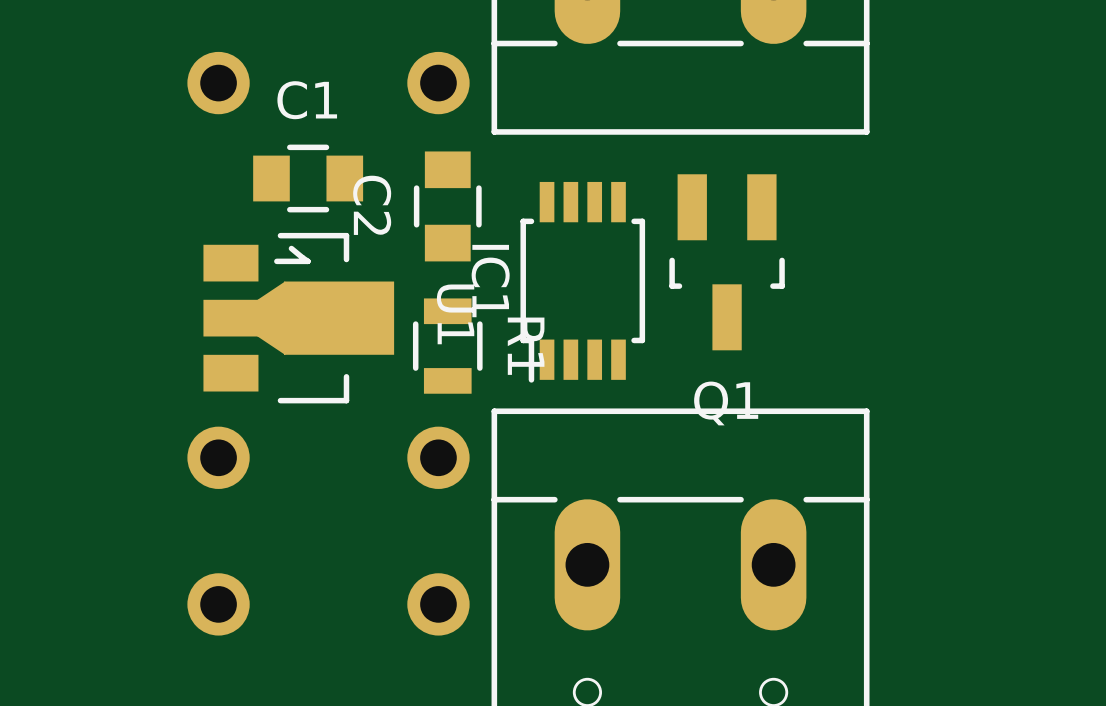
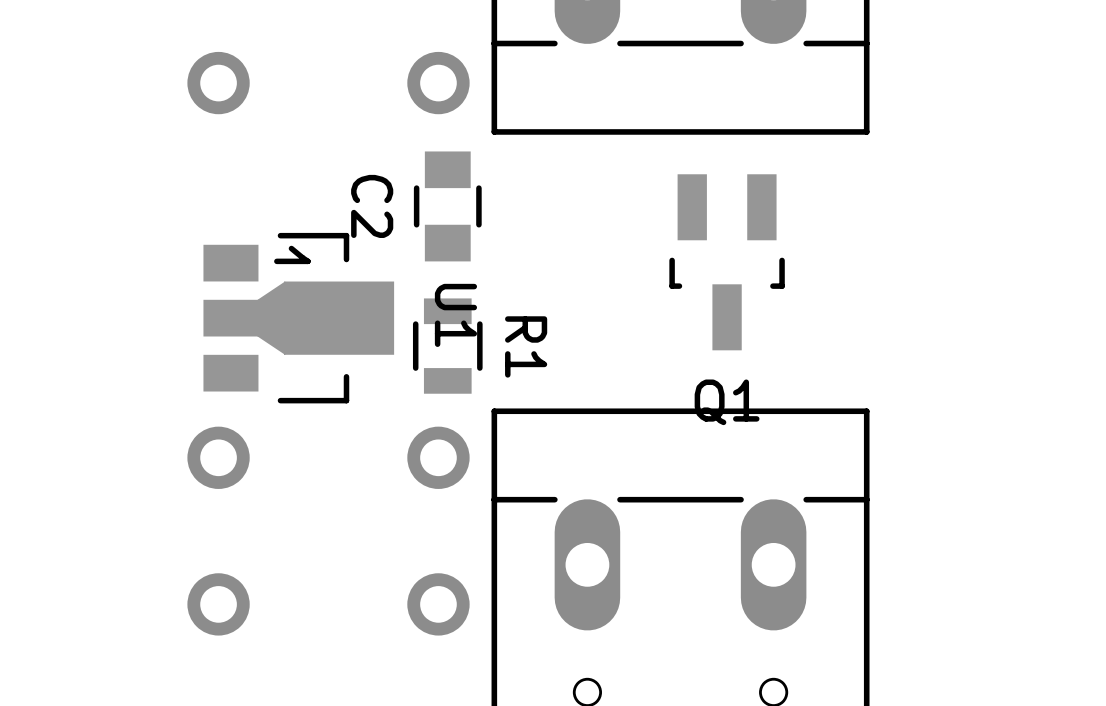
C1: (308, 178) -> none
IC1: (582, 282) -> none

